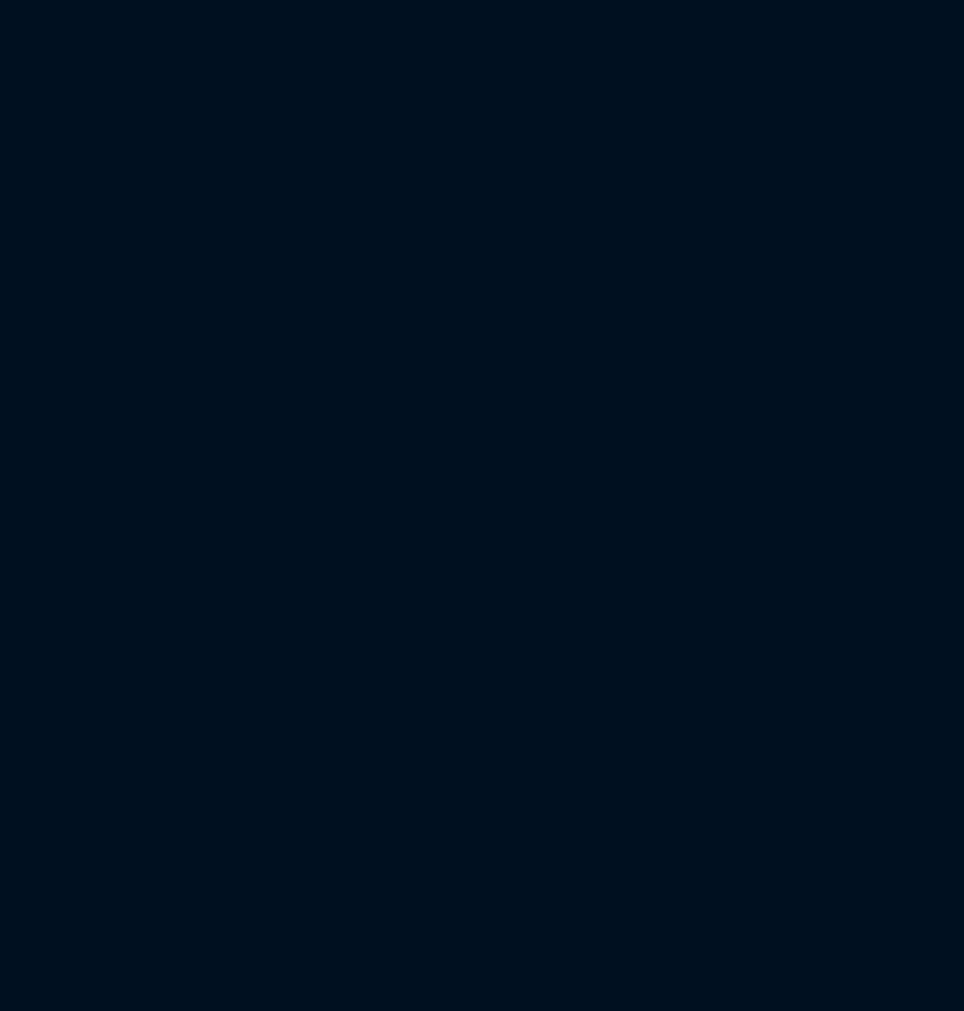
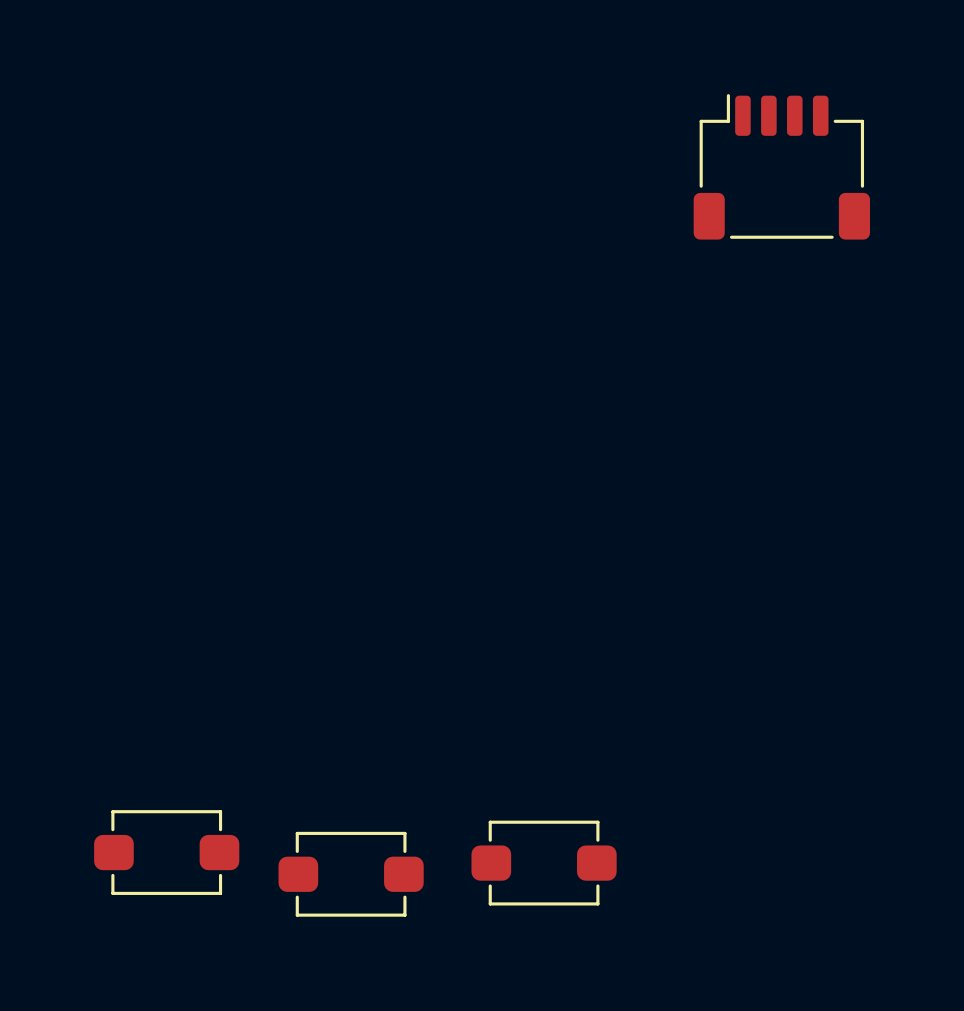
part: none -> (781, 166)
part: none -> (166, 852)
part: none -> (544, 863)
part: none -> (351, 874)

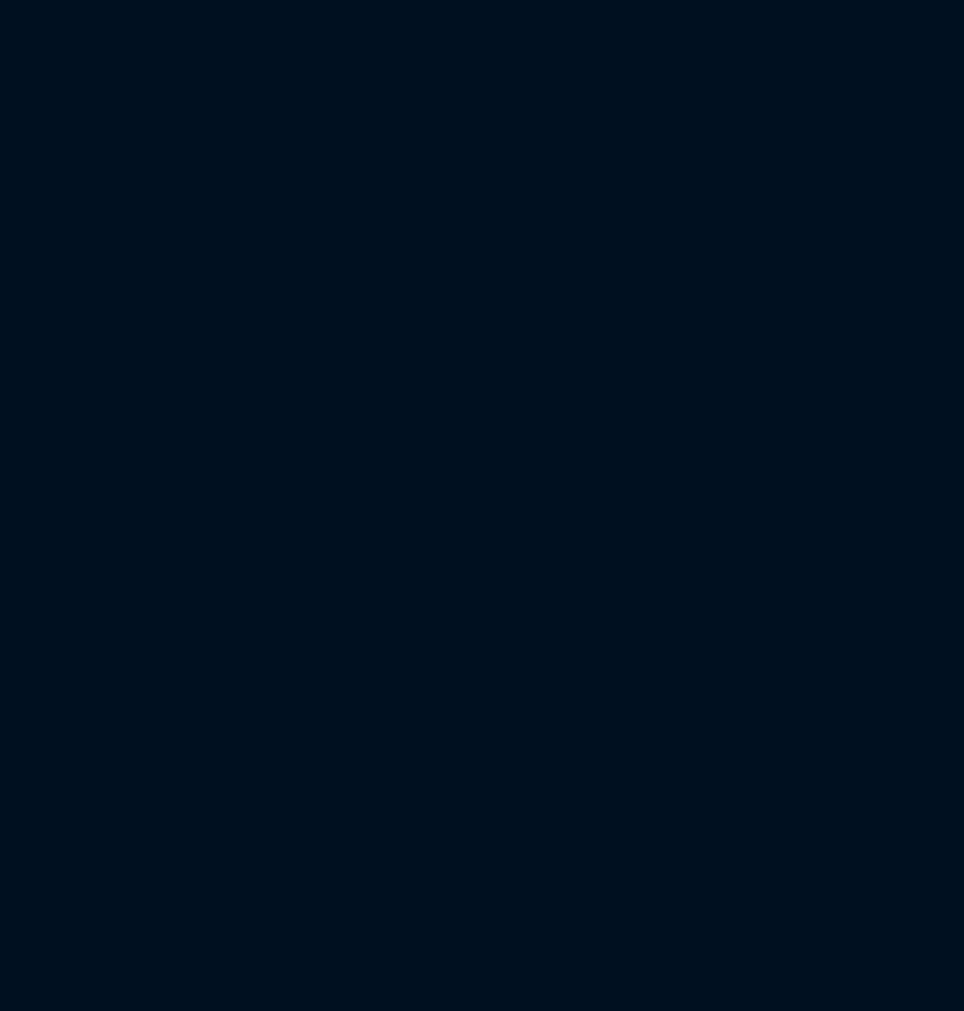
part: (781, 166) -> none
part: (166, 852) -> none
part: (544, 863) -> none
part: (351, 874) -> none

